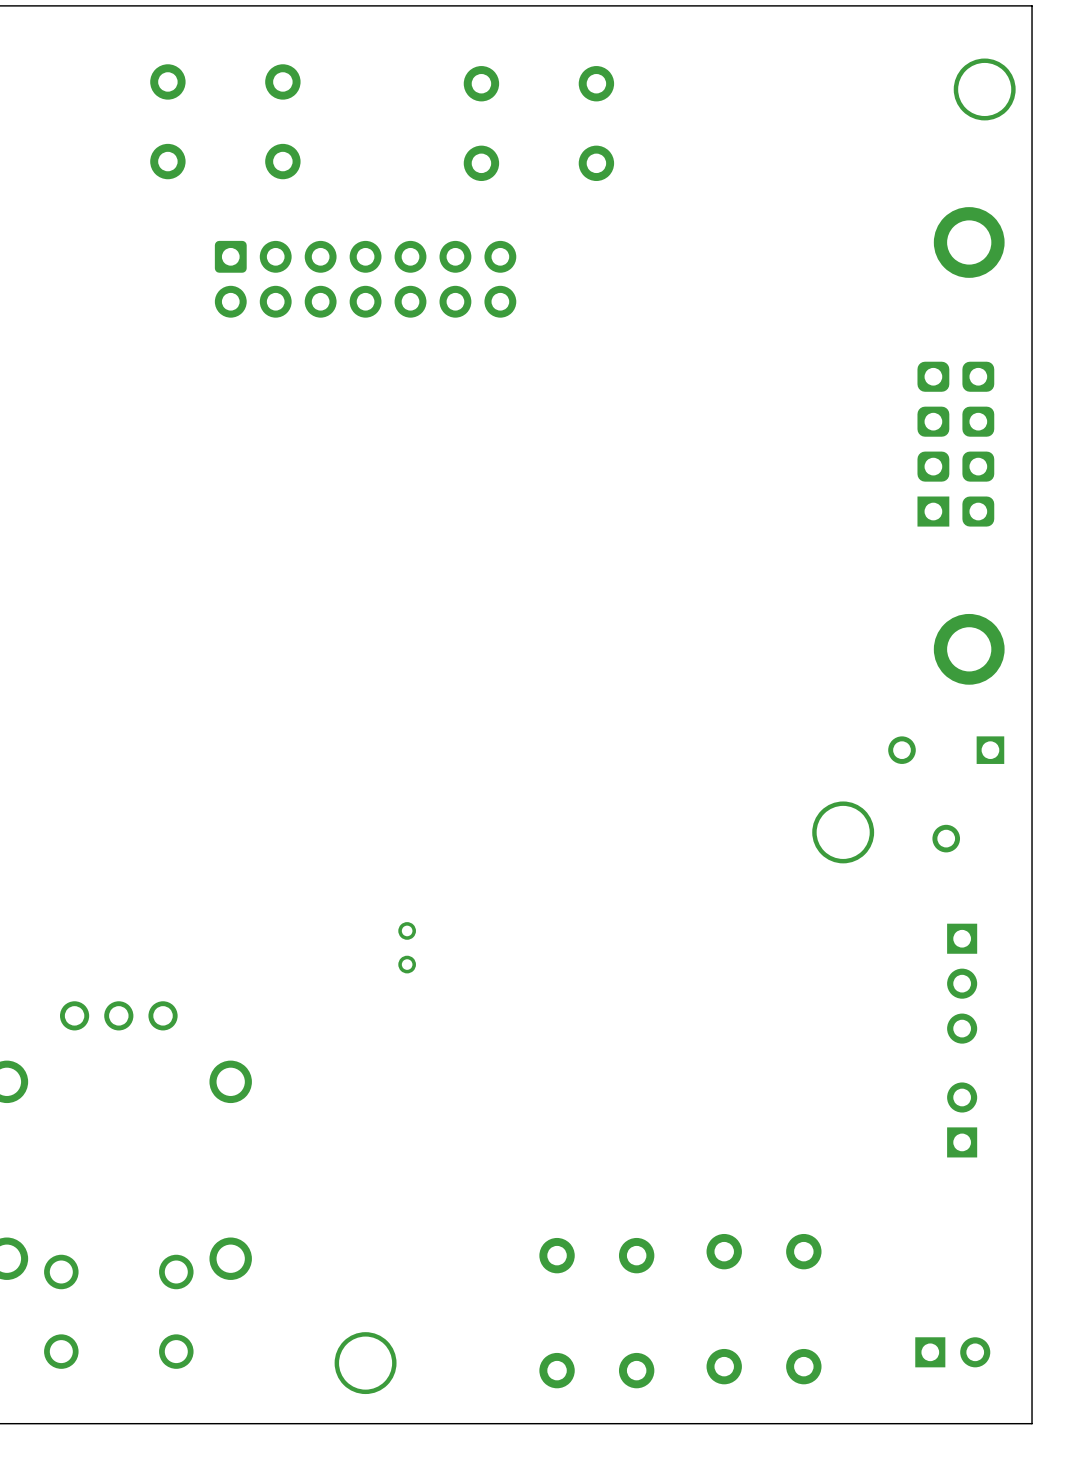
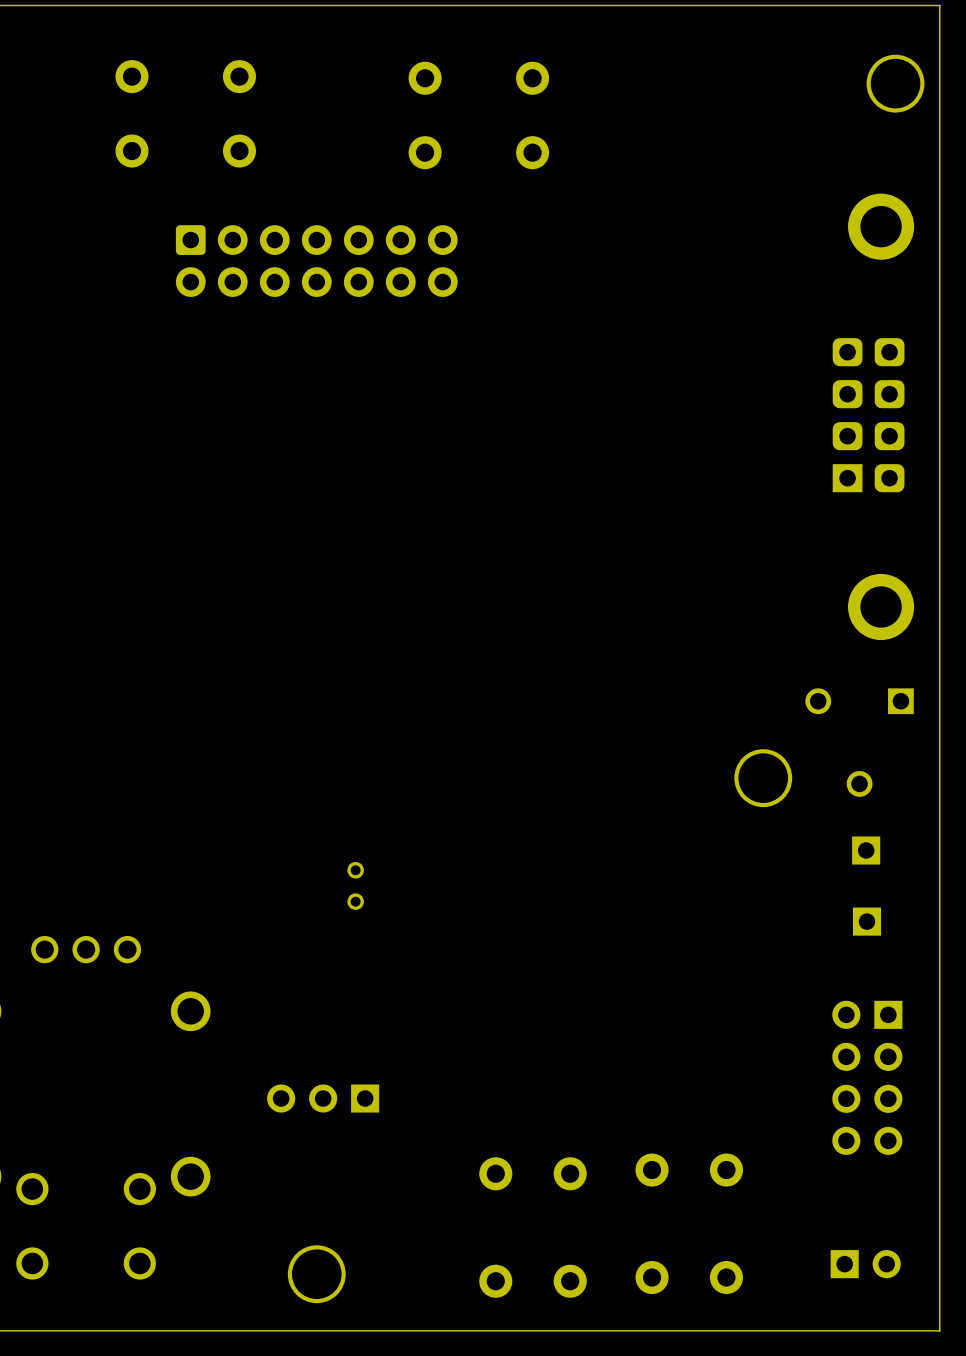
part: none -> (866, 850)
part footprint: [947, 923, 978, 1044] -> [852, 907, 882, 936]
part: (962, 1119) -> none
part: none -> (867, 1077)
part: none -> (323, 1098)

